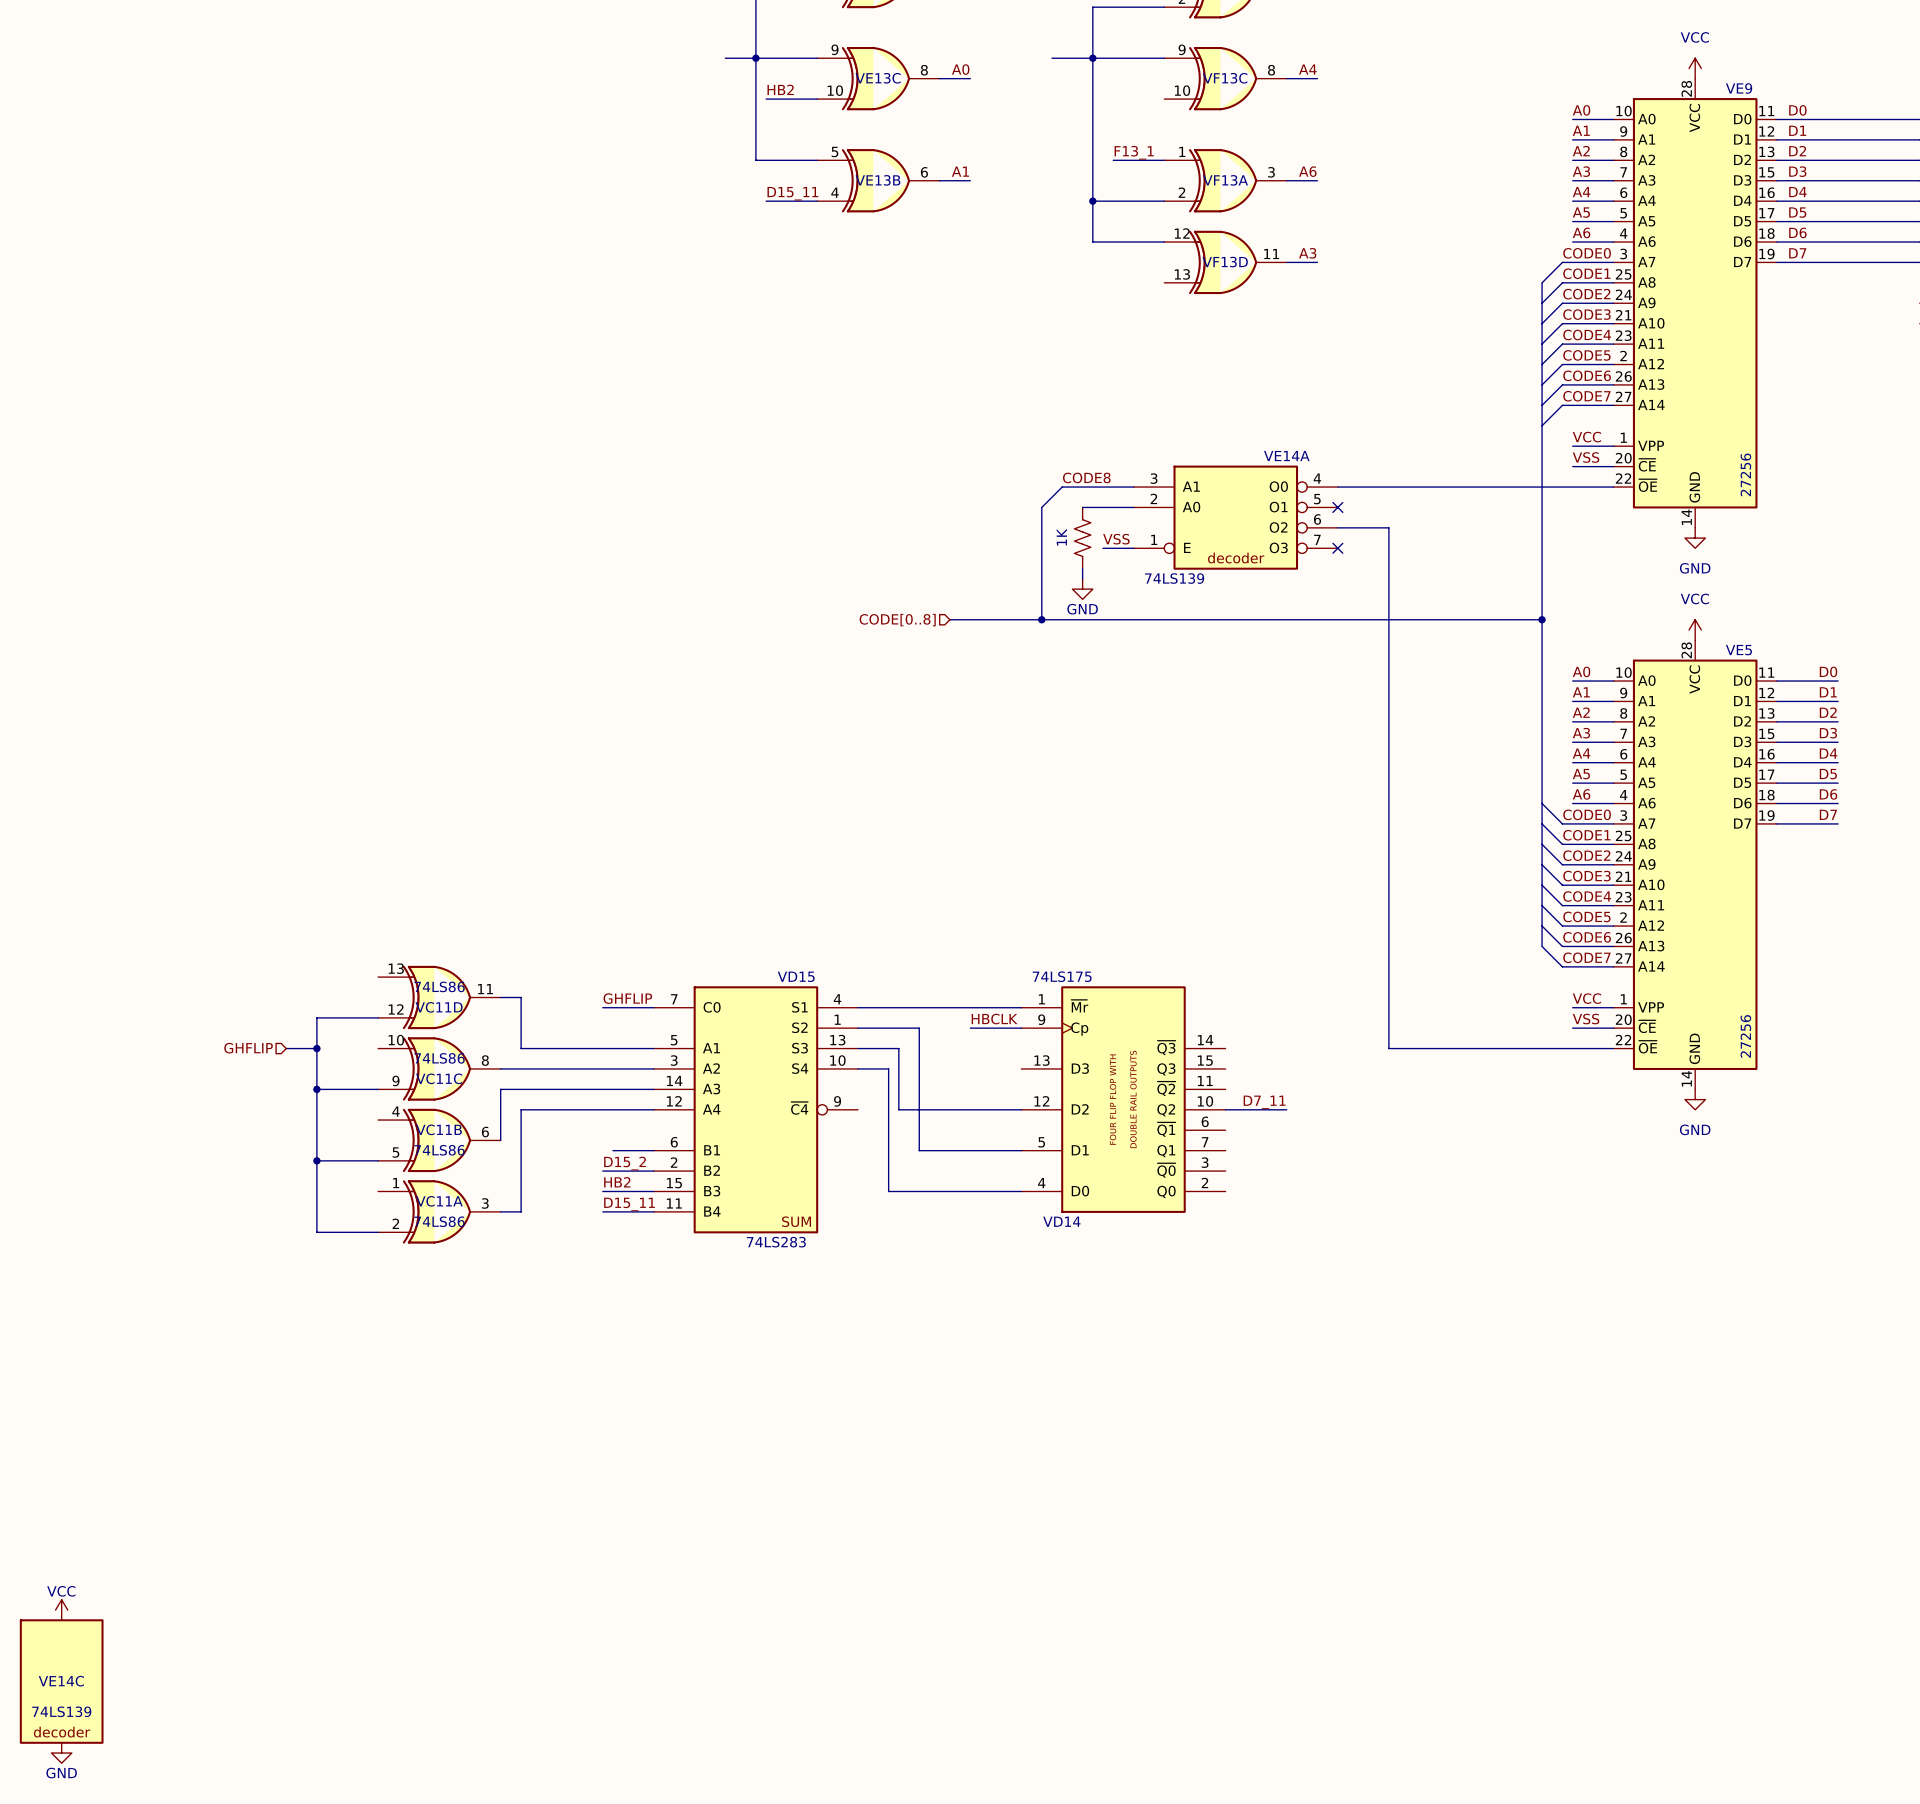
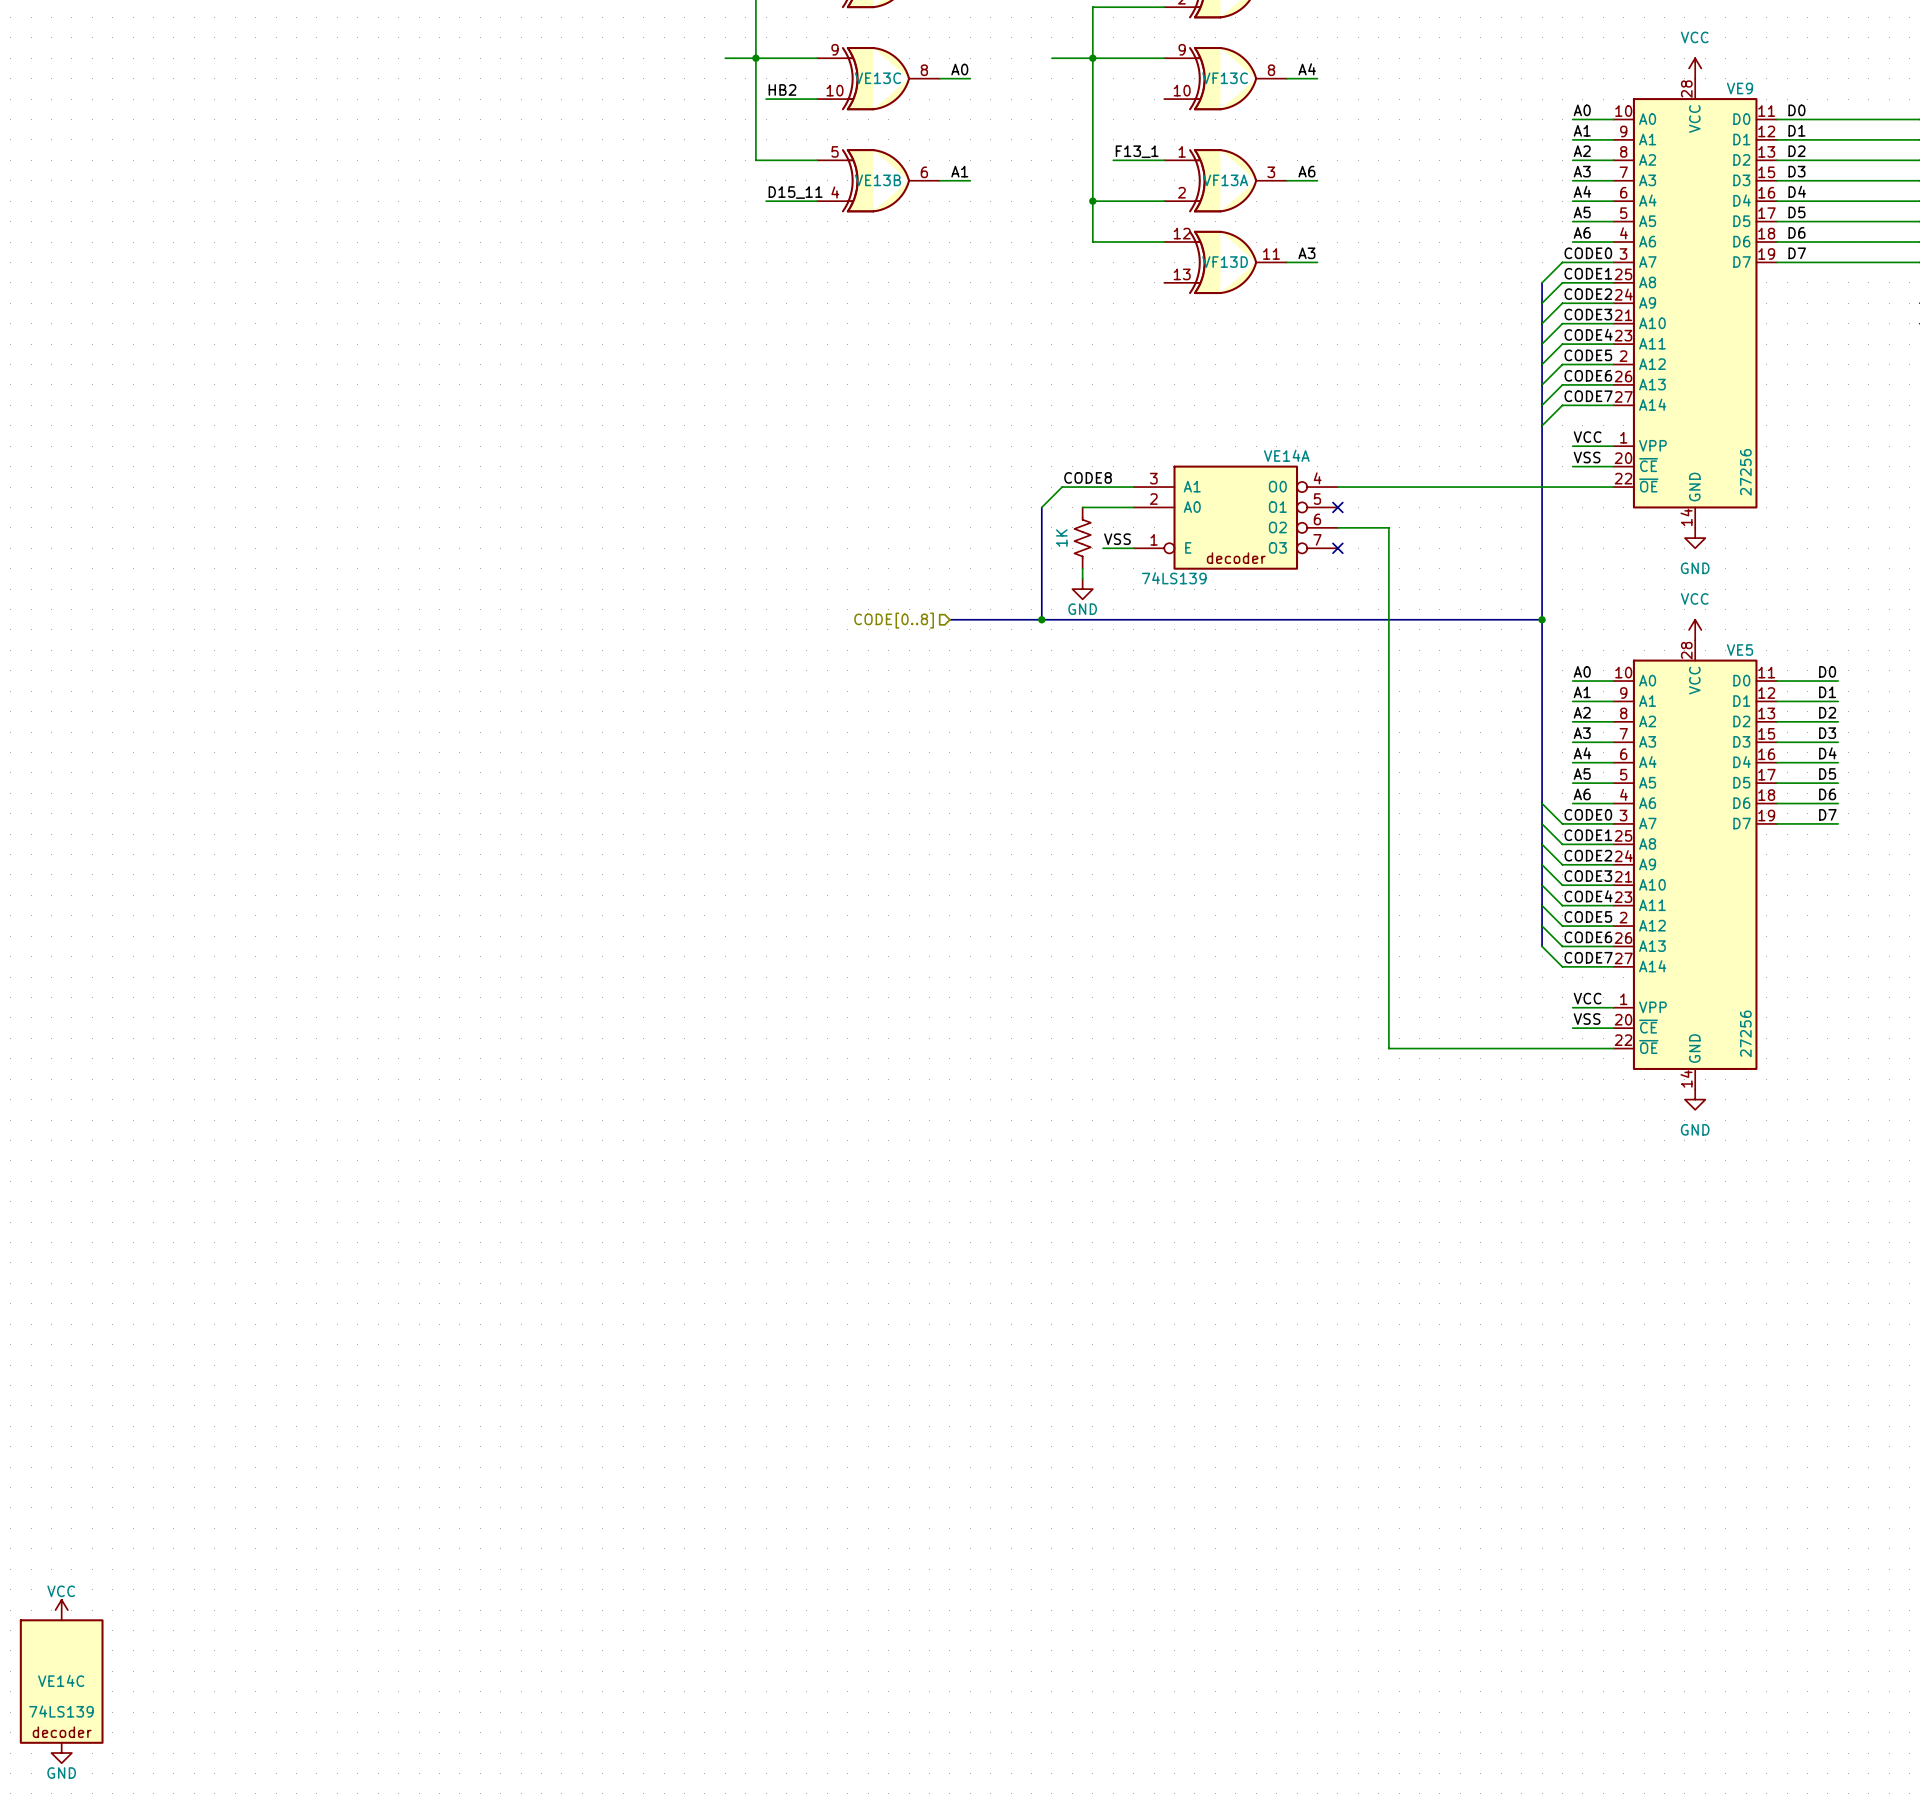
VC11D: 74LS86 (439, 997) -> none
wire: (500, 997) (521, 997) (521, 1048) (653, 1048) -> none
label: GHFLIP (627, 998) -> none
wire: (602, 1007) (653, 1007) -> none
wire: (858, 1007) (1021, 1007) -> none
wire: (378, 1017) (316, 1017) (316, 1232) (378, 1232) -> none
label: HBCLK (994, 1019) -> none
wire: (858, 1028) (919, 1028) (919, 1150) (1021, 1150) -> none
wire: (970, 1028) (1021, 1028) -> none
hierarchical label: GHFLIP (248, 1048) -> none
wire: (286, 1048) (316, 1048) -> none
junction: (316, 1048) -> none
wire: (858, 1048) (898, 1048) (898, 1109) (1021, 1109) -> none
VC11C: 74LS86 (439, 1068) -> none
wire: (500, 1068) (653, 1068) -> none
wire: (858, 1068) (888, 1068) (888, 1191) (1021, 1191) -> none
wire: (316, 1089) (378, 1089) -> none
junction: (316, 1089) -> none
wire: (653, 1089) (500, 1089) (500, 1140) -> none
VD14: 74LS175 (1123, 1099) -> none
label: D7_11 (1264, 1102) -> none
wire: (653, 1109) (521, 1109) (521, 1211) (500, 1211) -> none
VD15: 74LS283 (755, 1109) -> none
wire: (1225, 1109) (1286, 1109) -> none
VC11B: 74LS86 (439, 1140) -> none
wire: (612, 1150) (653, 1150) -> none
wire: (316, 1160) (378, 1160) -> none
junction: (316, 1160) -> none
label: D15_2 (625, 1163) -> none
wire: (602, 1171) (653, 1171) -> none
label: HB2 (617, 1182) -> none
wire: (602, 1191) (653, 1191) -> none
label: D15_11 (629, 1204) -> none
VC11A: 74LS86 (439, 1211) -> none
wire: (602, 1211) (653, 1211) -> none

